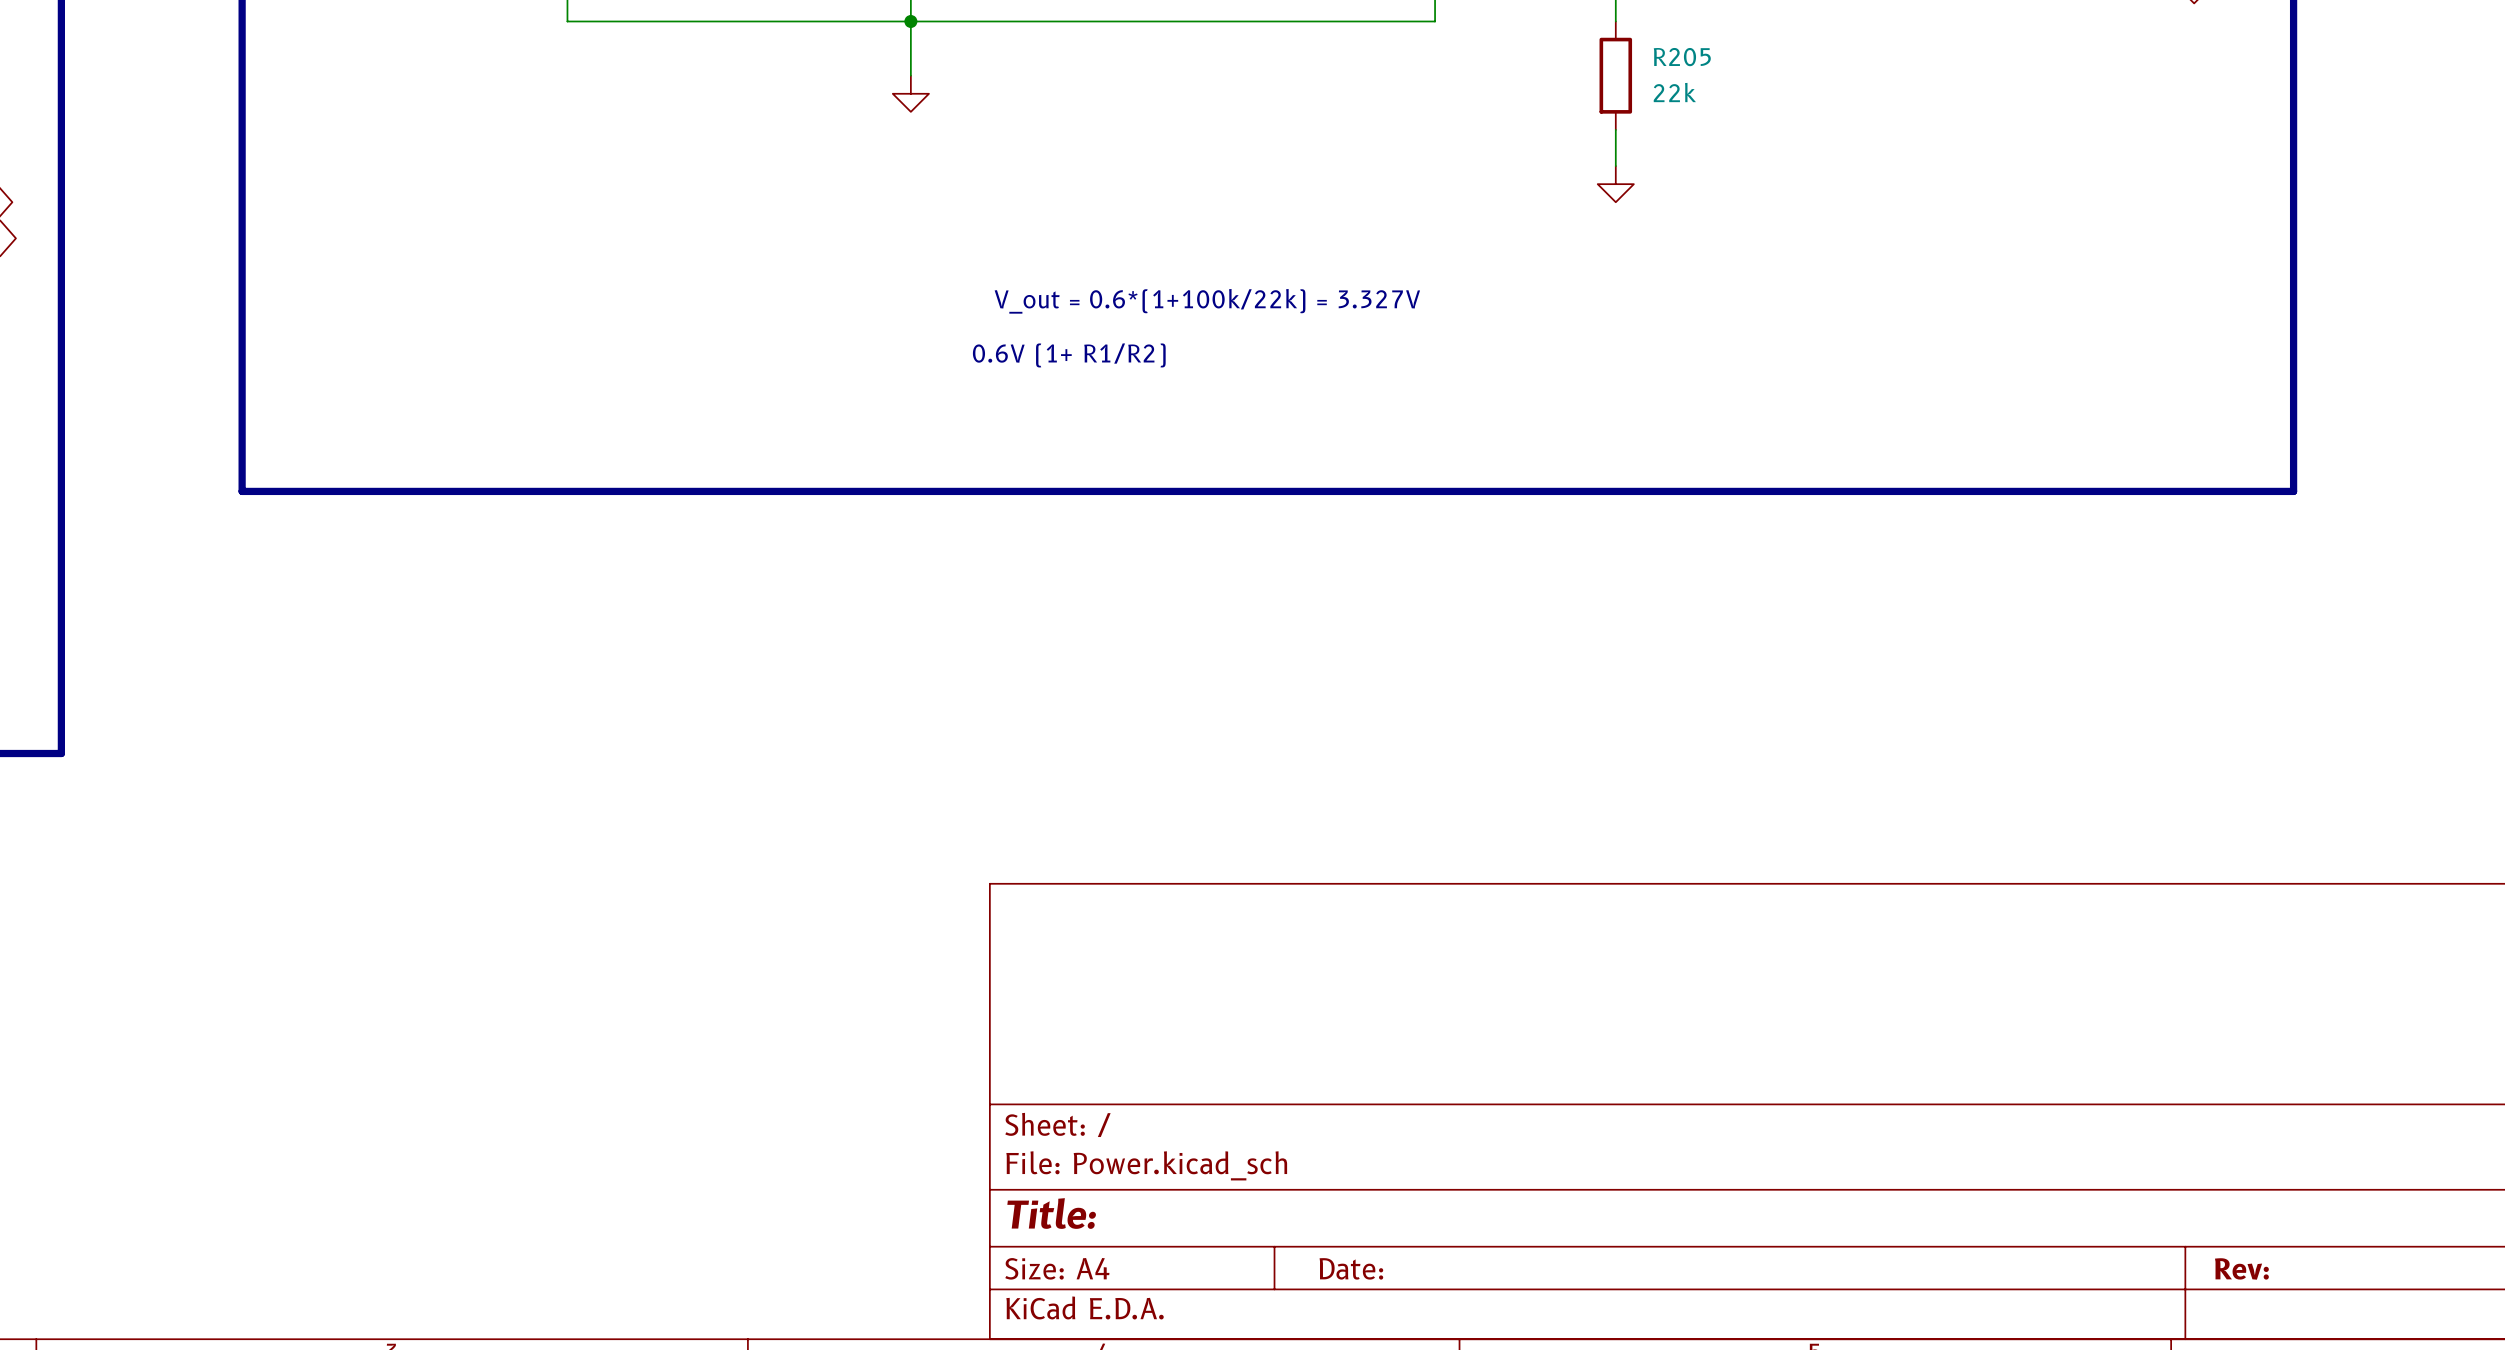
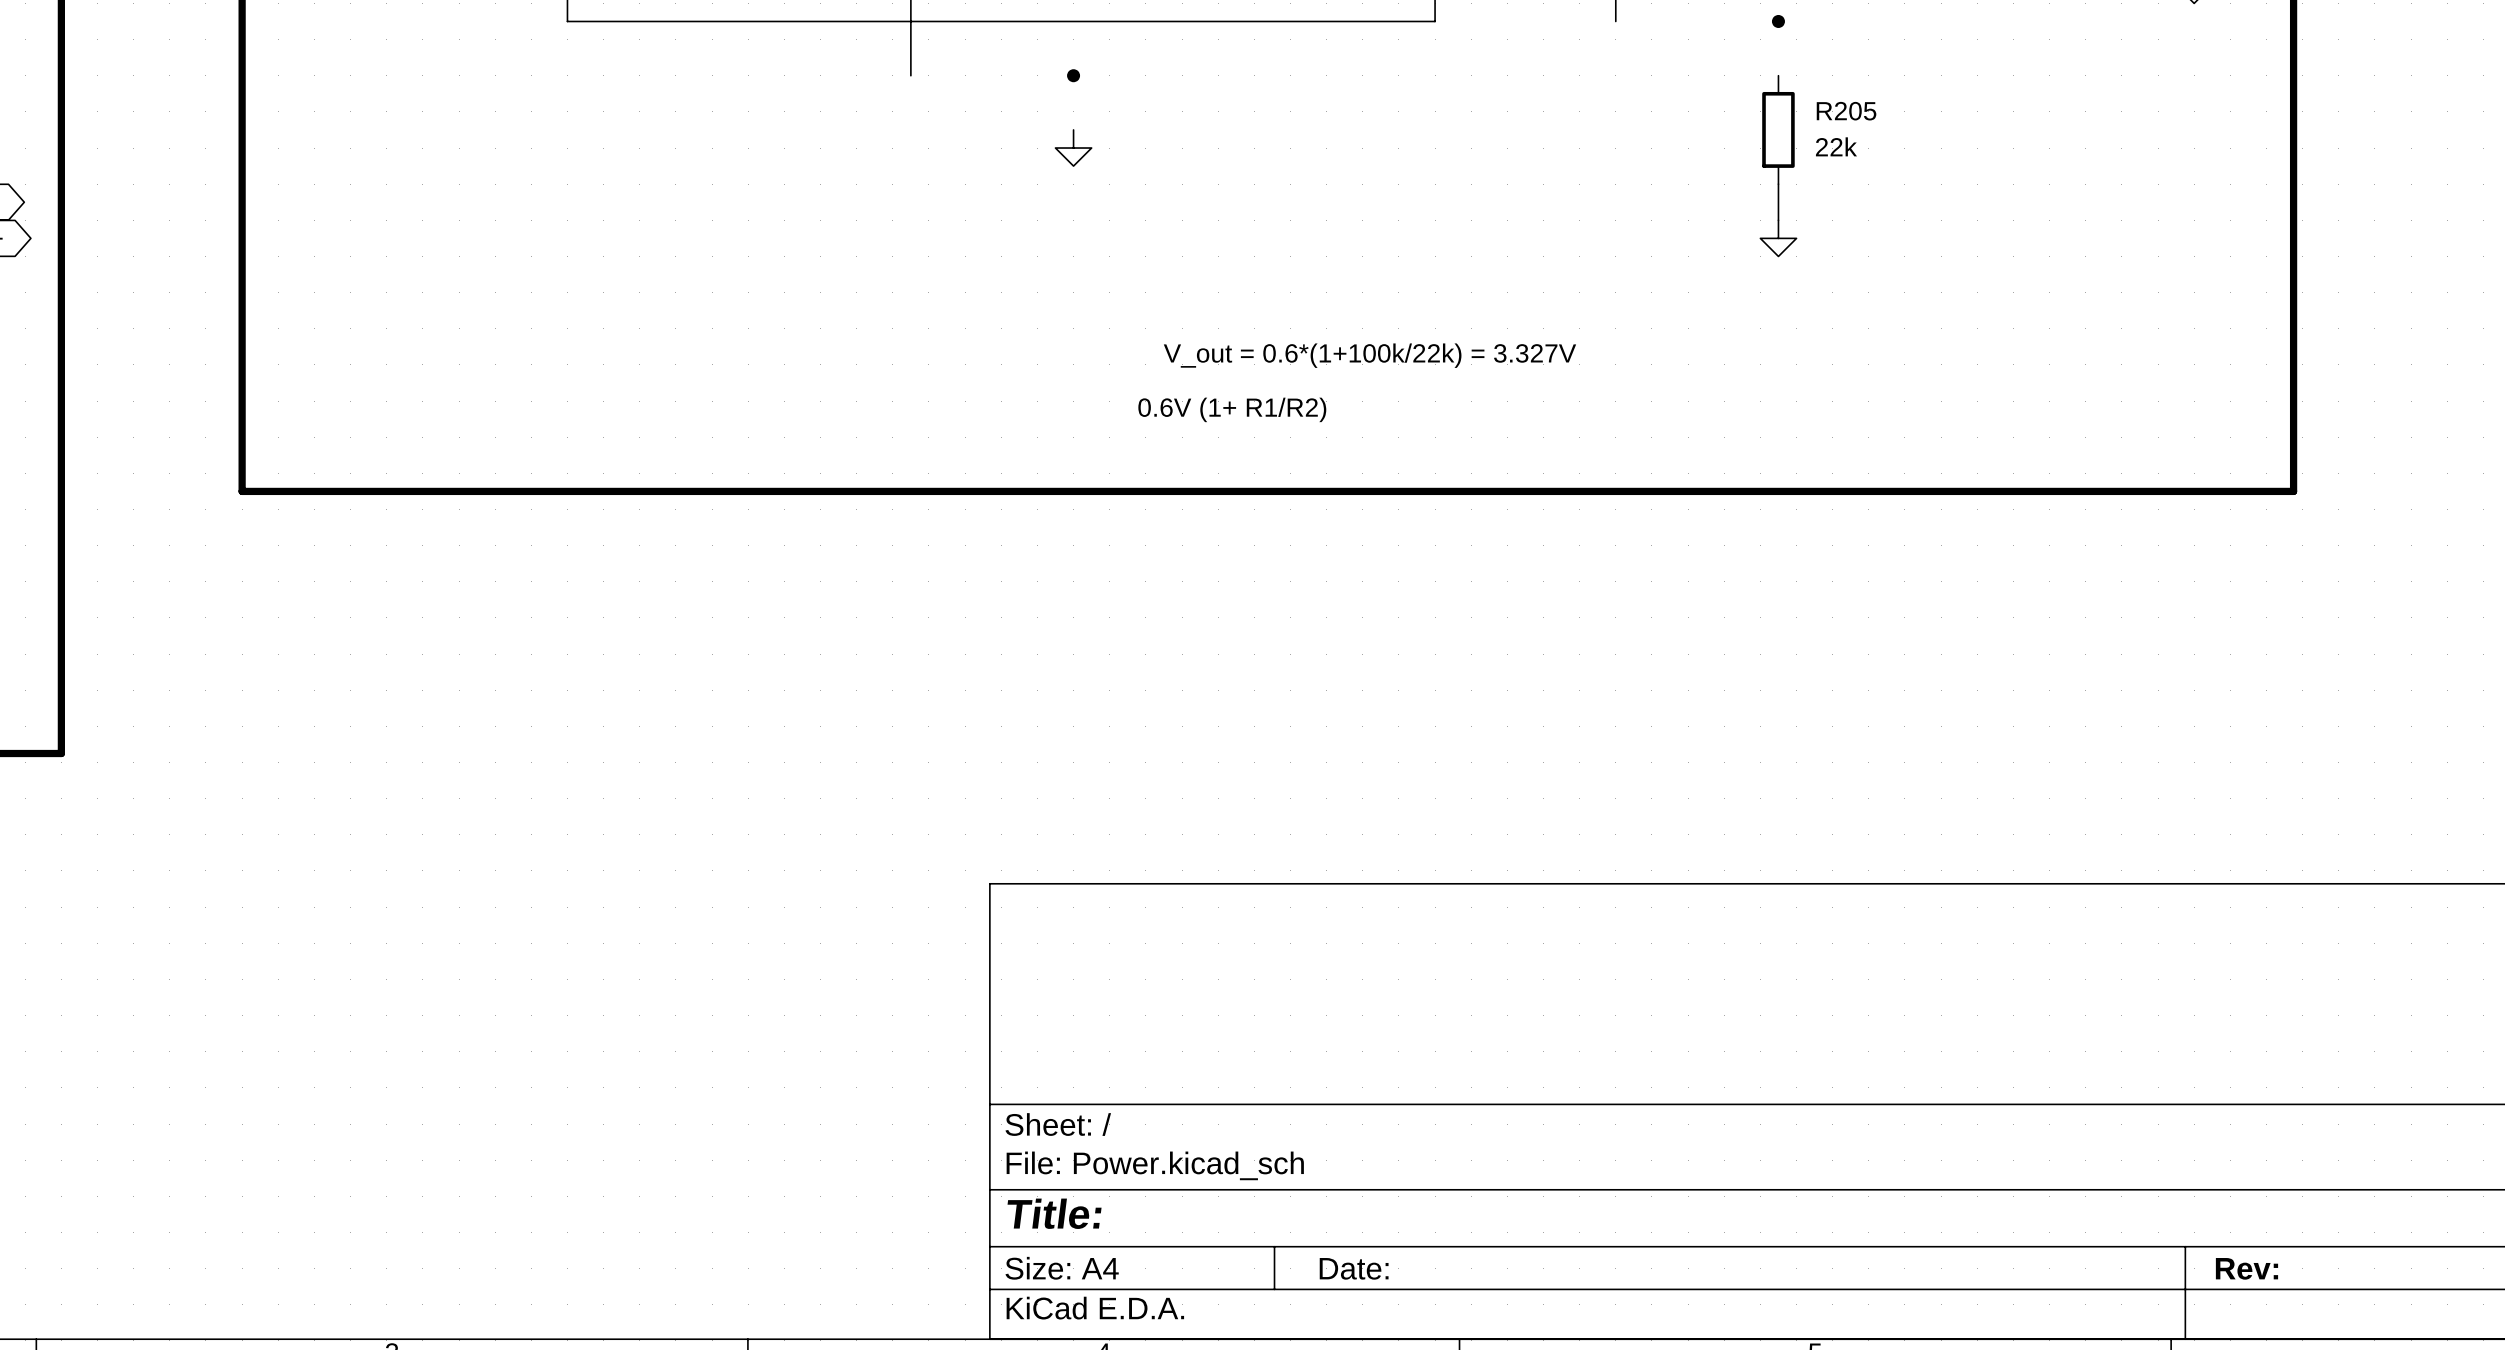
junction: (910, 21) -> none
junction: none -> (1778, 21)
junction: none -> (1073, 75)
R205 position: (1615, 75) -> (1778, 129)
power symbol position: (910, 93) -> (1073, 148)
wire: (1615, 129) (1615, 166) -> (1778, 184) (1778, 220)
power symbol position: (1615, 184) -> (1778, 238)
text position: V_out = 0.6*(1+100k/22k) = 3.327V (1207, 301) -> V_out = 0.6*(1+100k/22k) = 3.327V (1369, 355)
text position: 0.6V (1+ R1/R2) (1069, 355) -> 0.6V (1+ R1/R2) (1232, 409)

